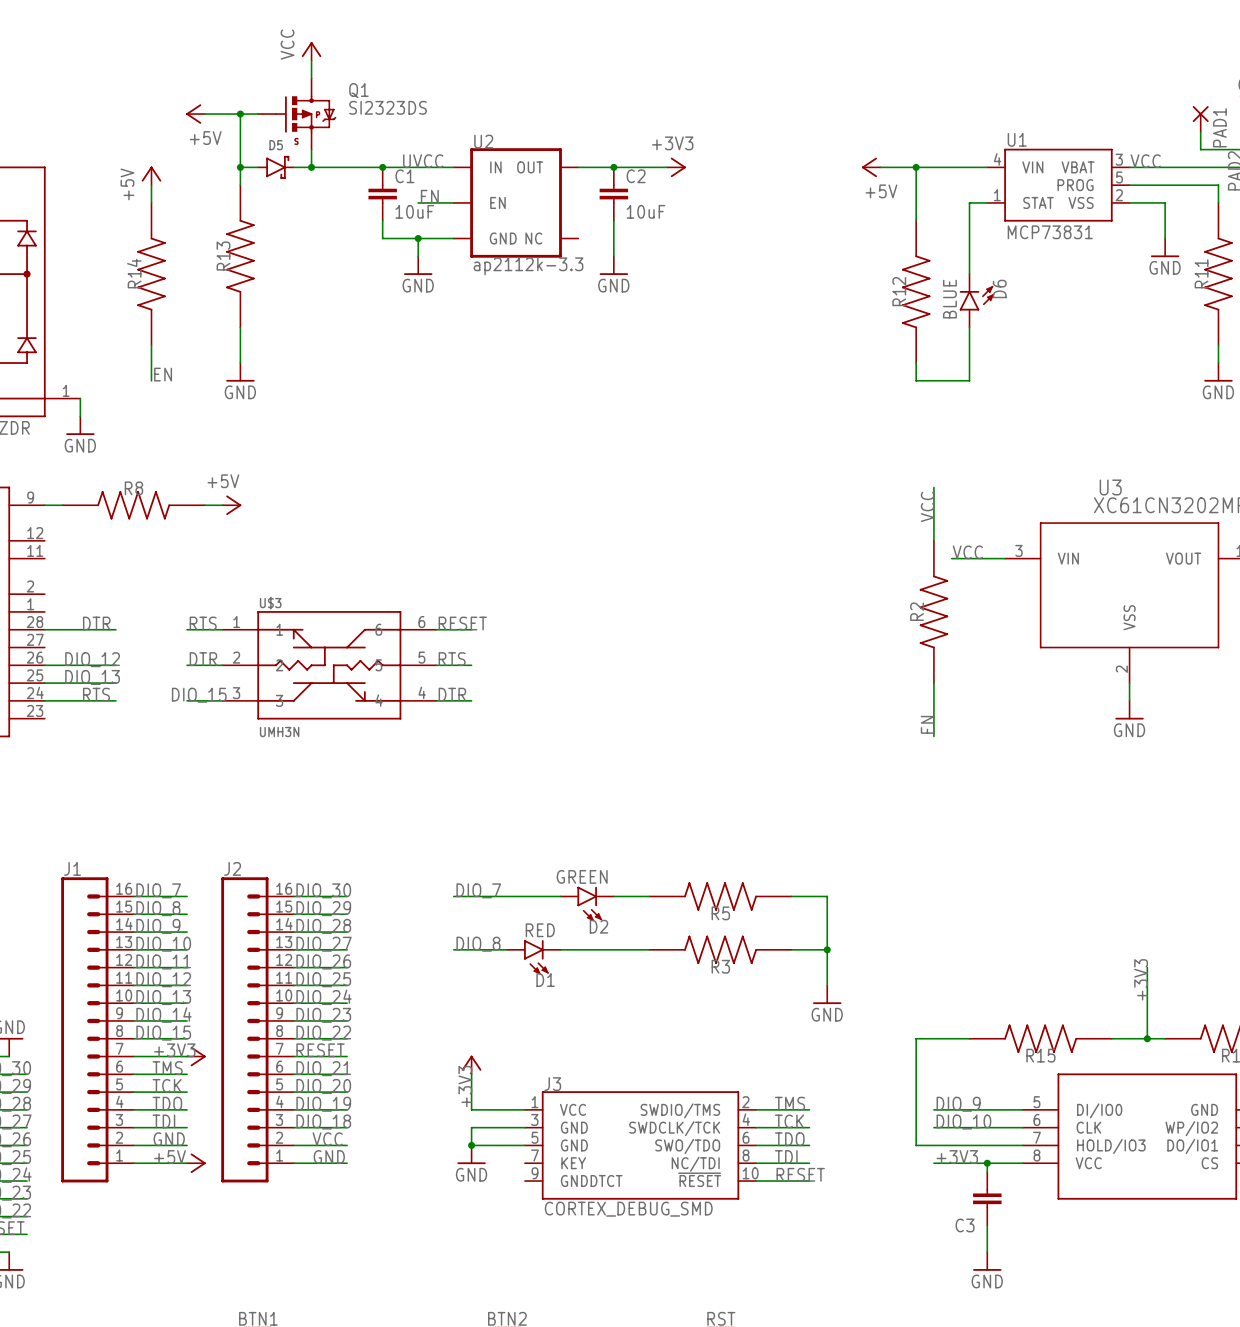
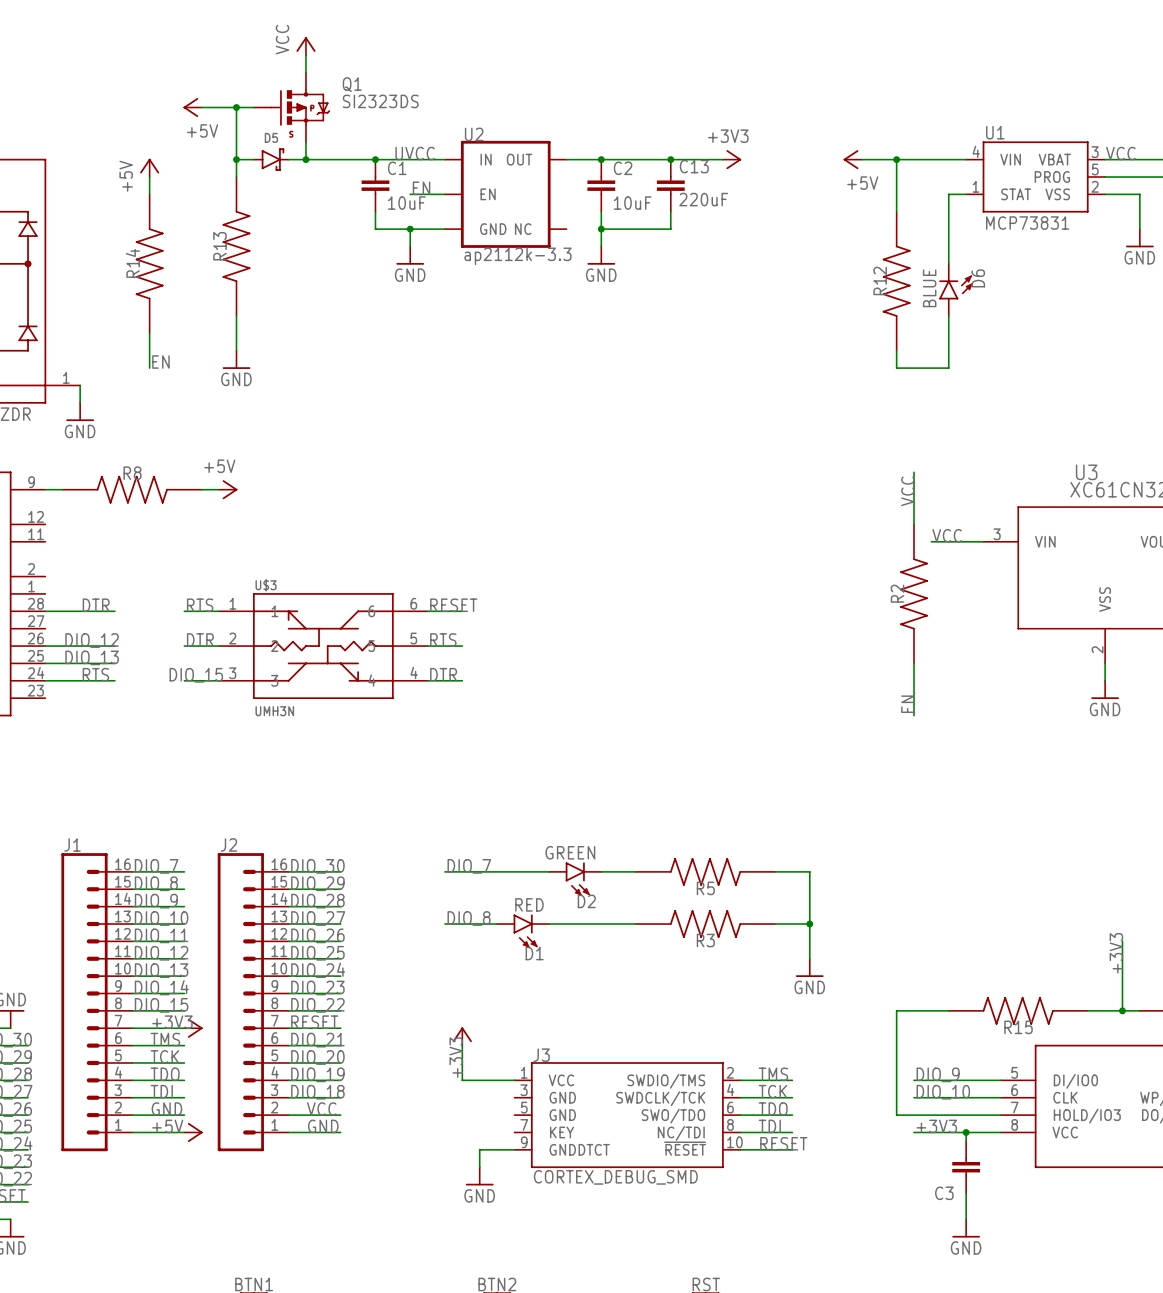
wire: none -> (653, 159) (722, 159)
power symbol position: +3V3 (676, 167) -> +3V3 (732, 159)
junction: none -> (670, 159)
C13: none -> 220uF (670, 185)
wire: none -> (670, 211) (670, 229) (601, 229)
junction: none -> (601, 229)
wire: (524, 1127) (471, 1127) (471, 1145) (524, 1145) -> none
junction: (471, 1145) -> none
power symbol position: GND (471, 1154) -> GND (479, 1176)
wire: none -> (514, 1149) (479, 1149) (479, 1167)

